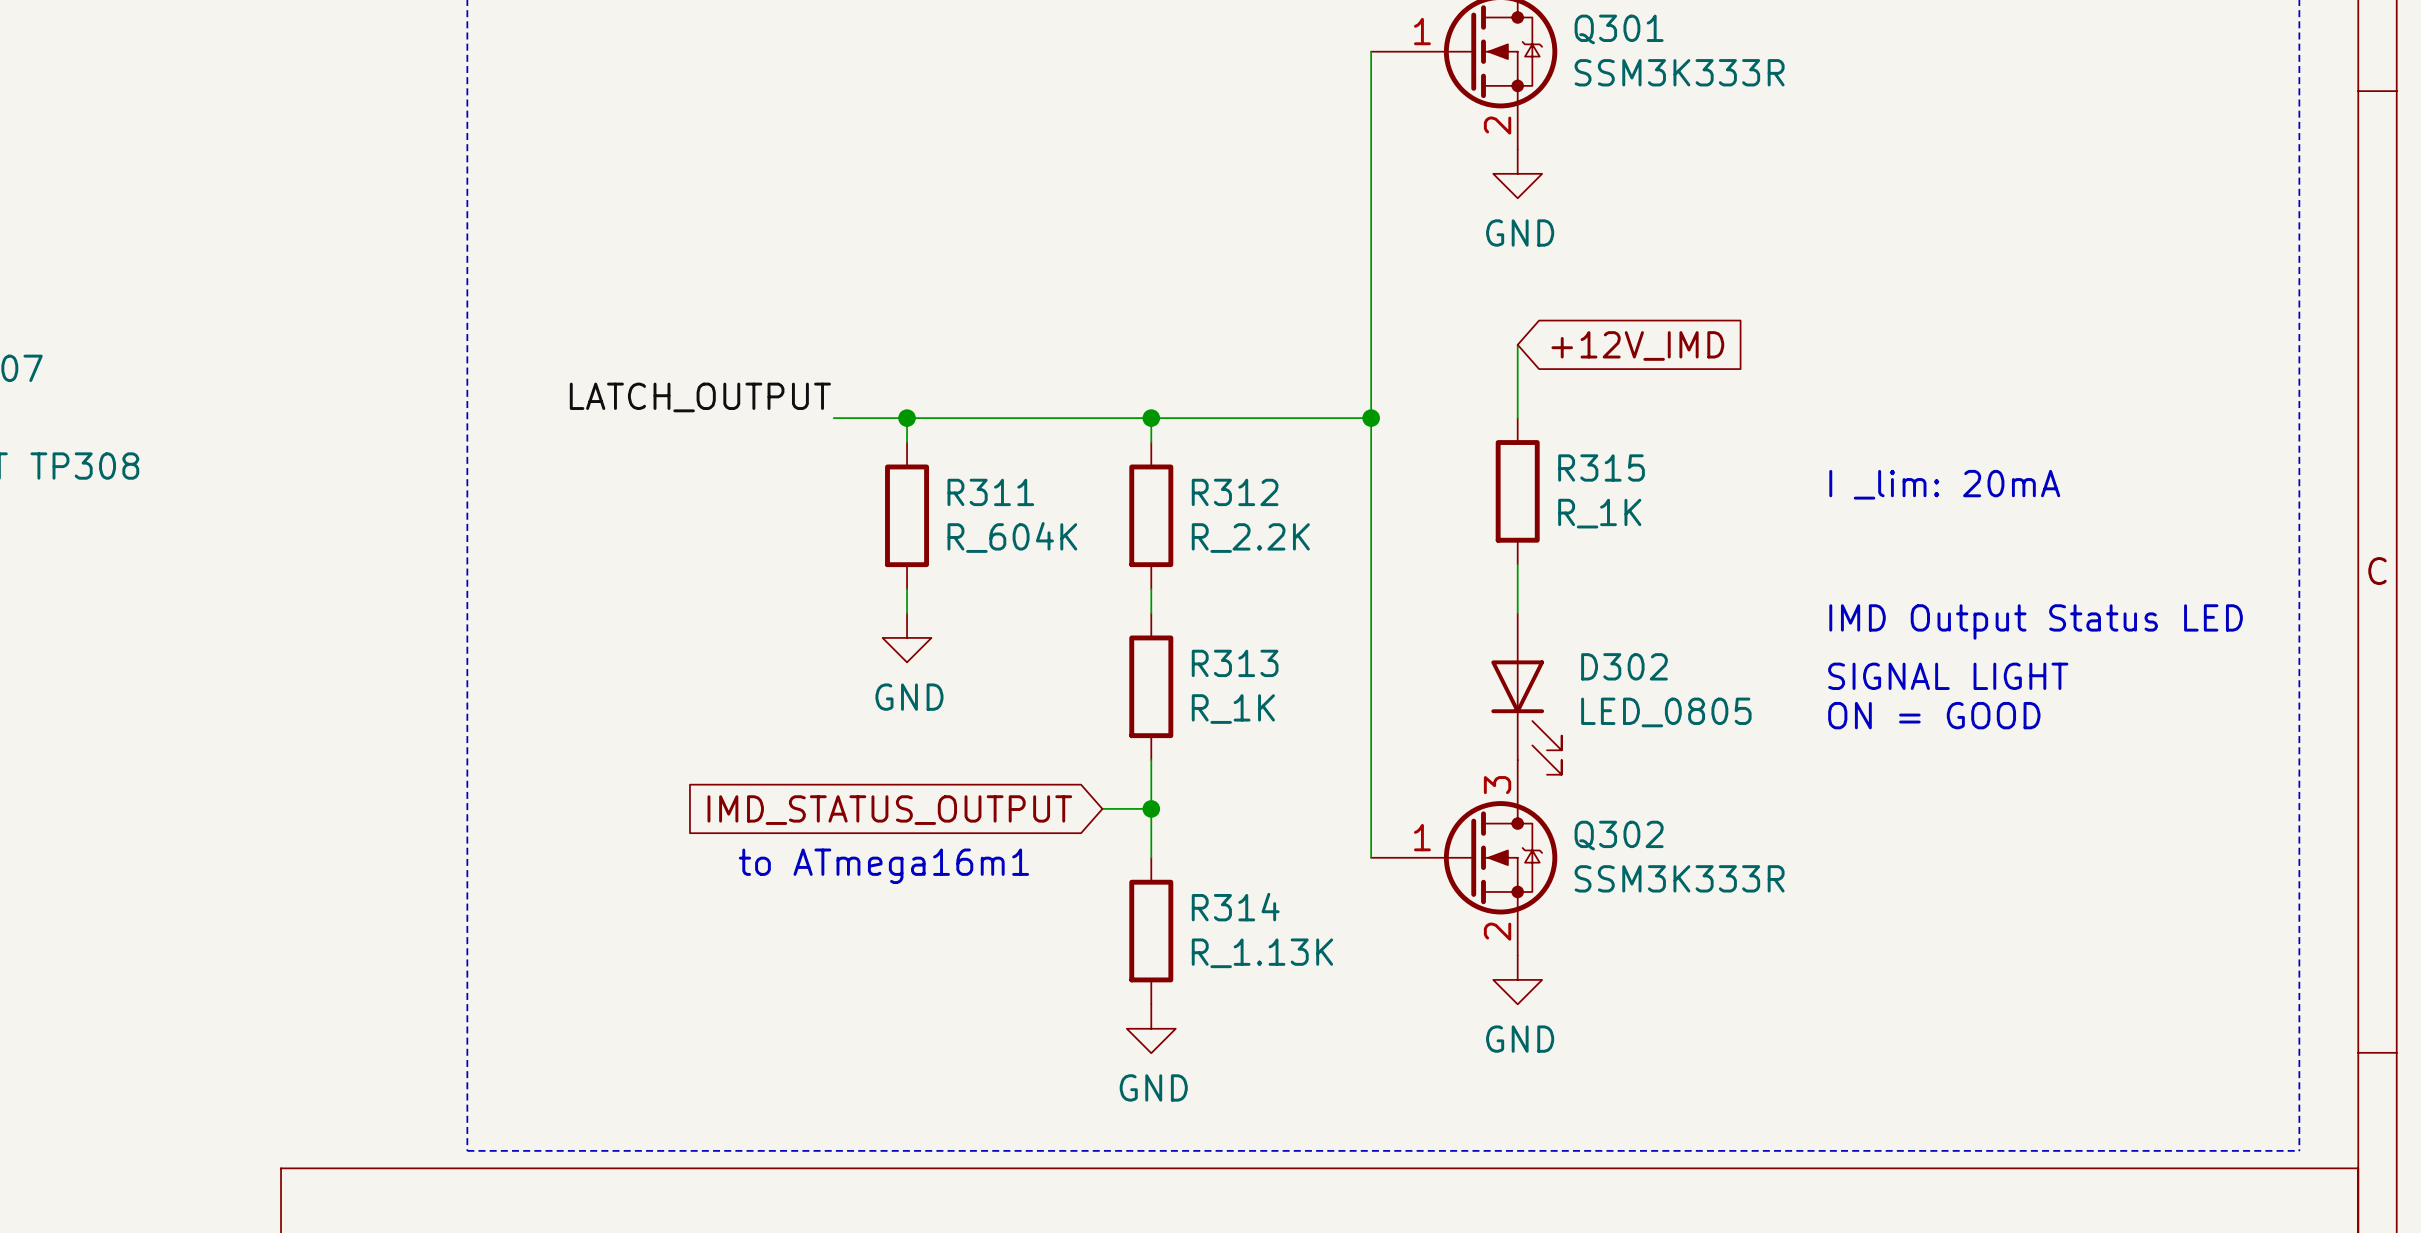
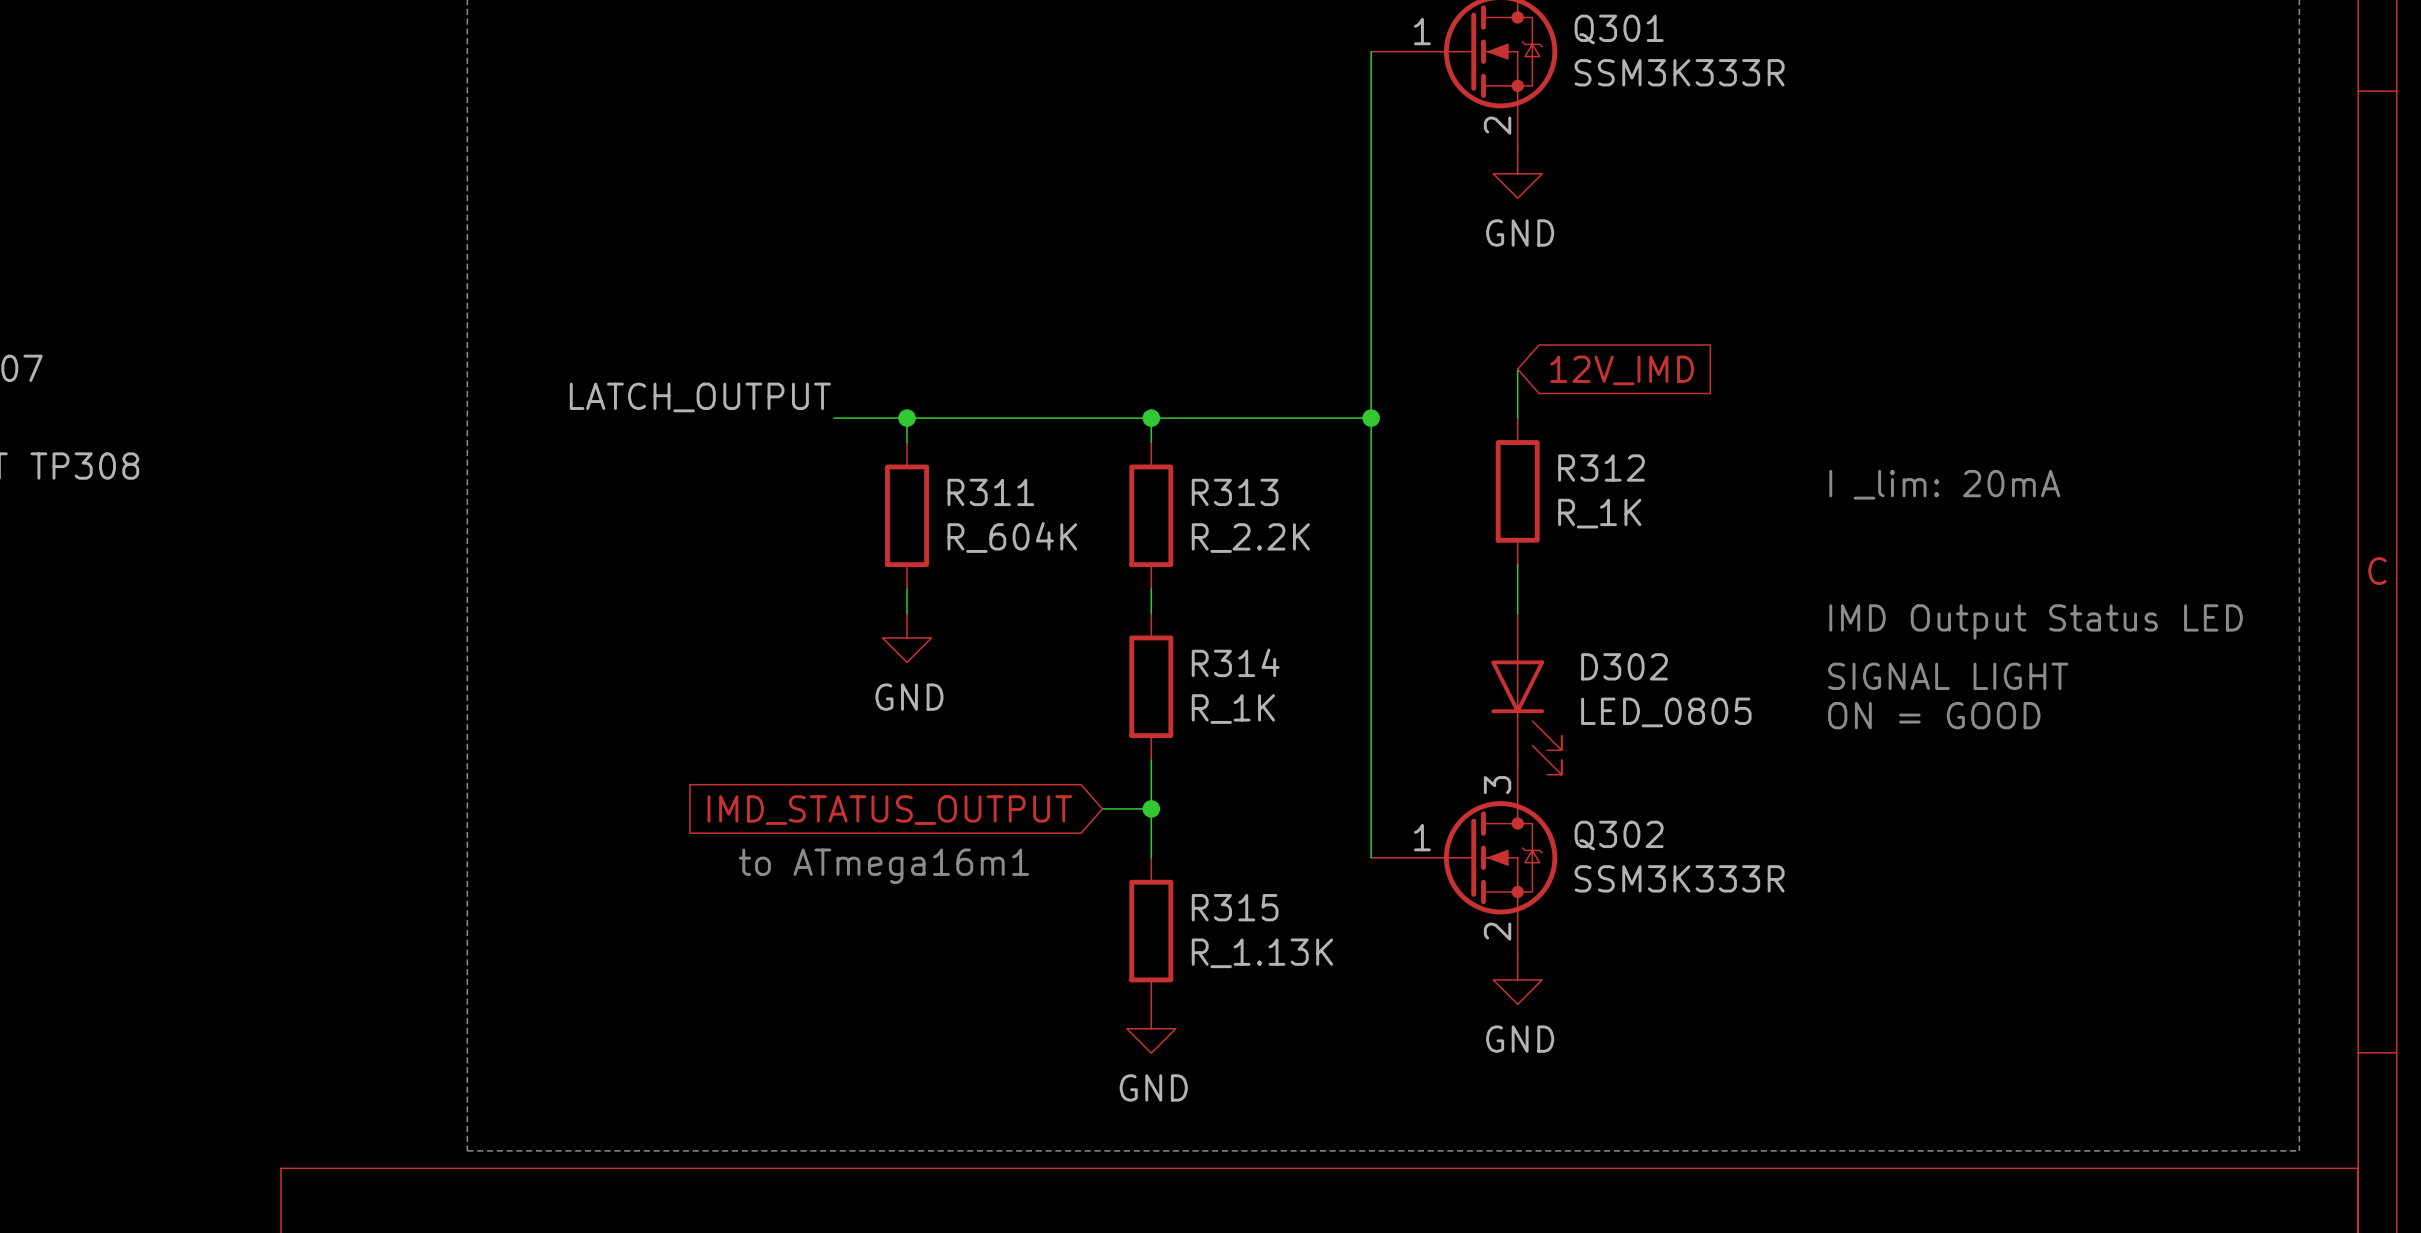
wire: (1517, 344) (1517, 369) -> none
global label: +12V_IMD (1637, 345) -> 12V_IMD (1622, 370)
R315 name: R315 (1601, 467) -> R312 (1601, 467)
R312 name: R312 (1235, 492) -> R313 (1235, 492)
R313 name: R313 (1235, 663) -> R314 (1235, 662)
R314 name: R314 (1235, 907) -> R315 (1235, 907)

